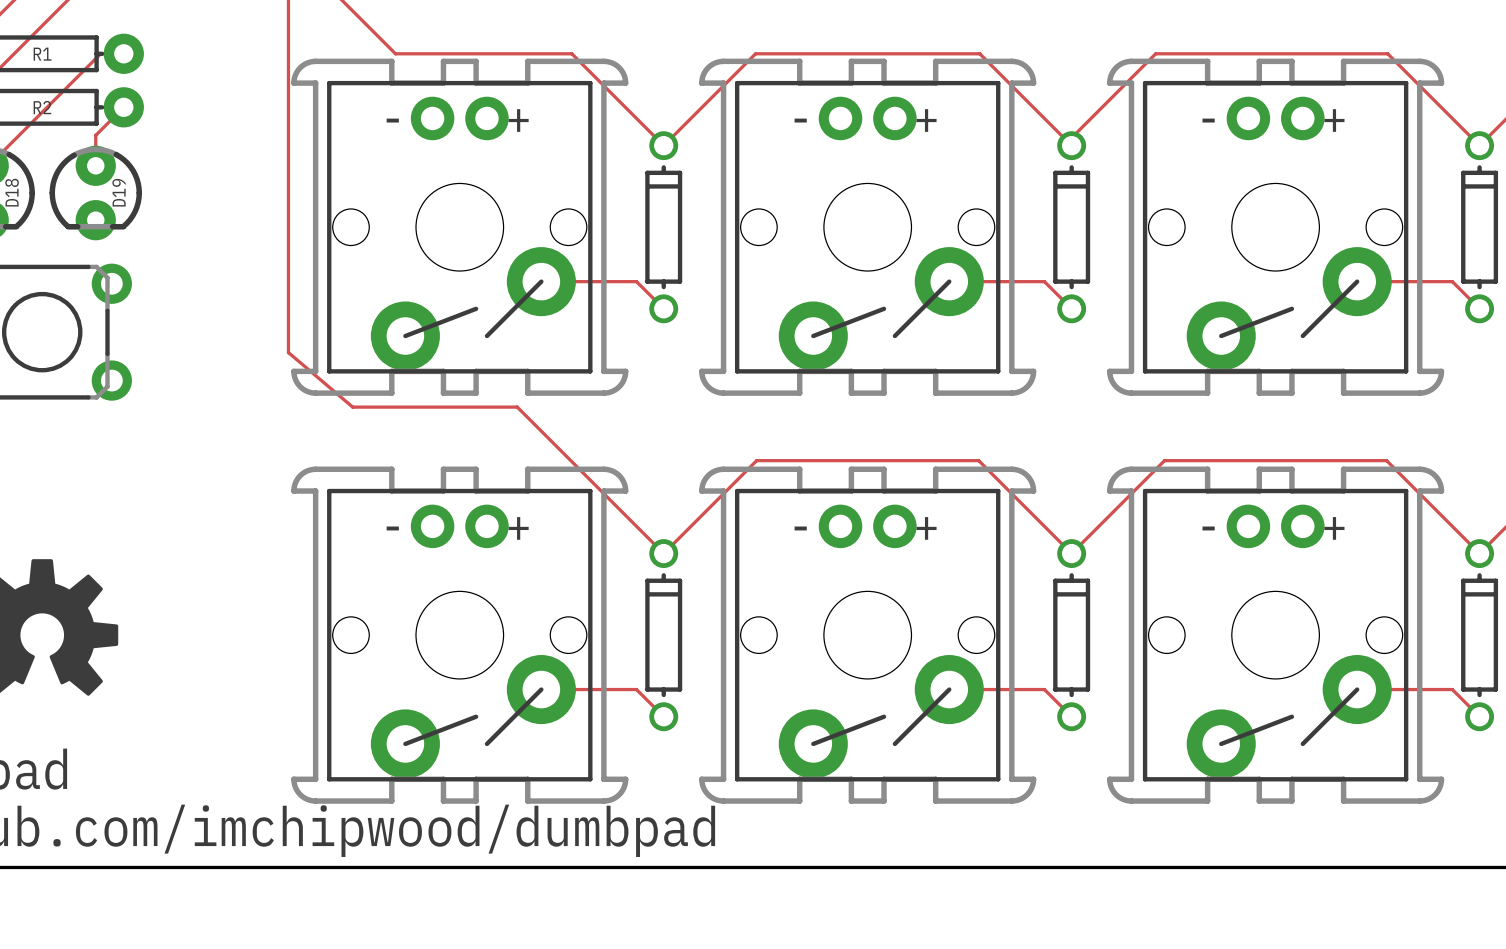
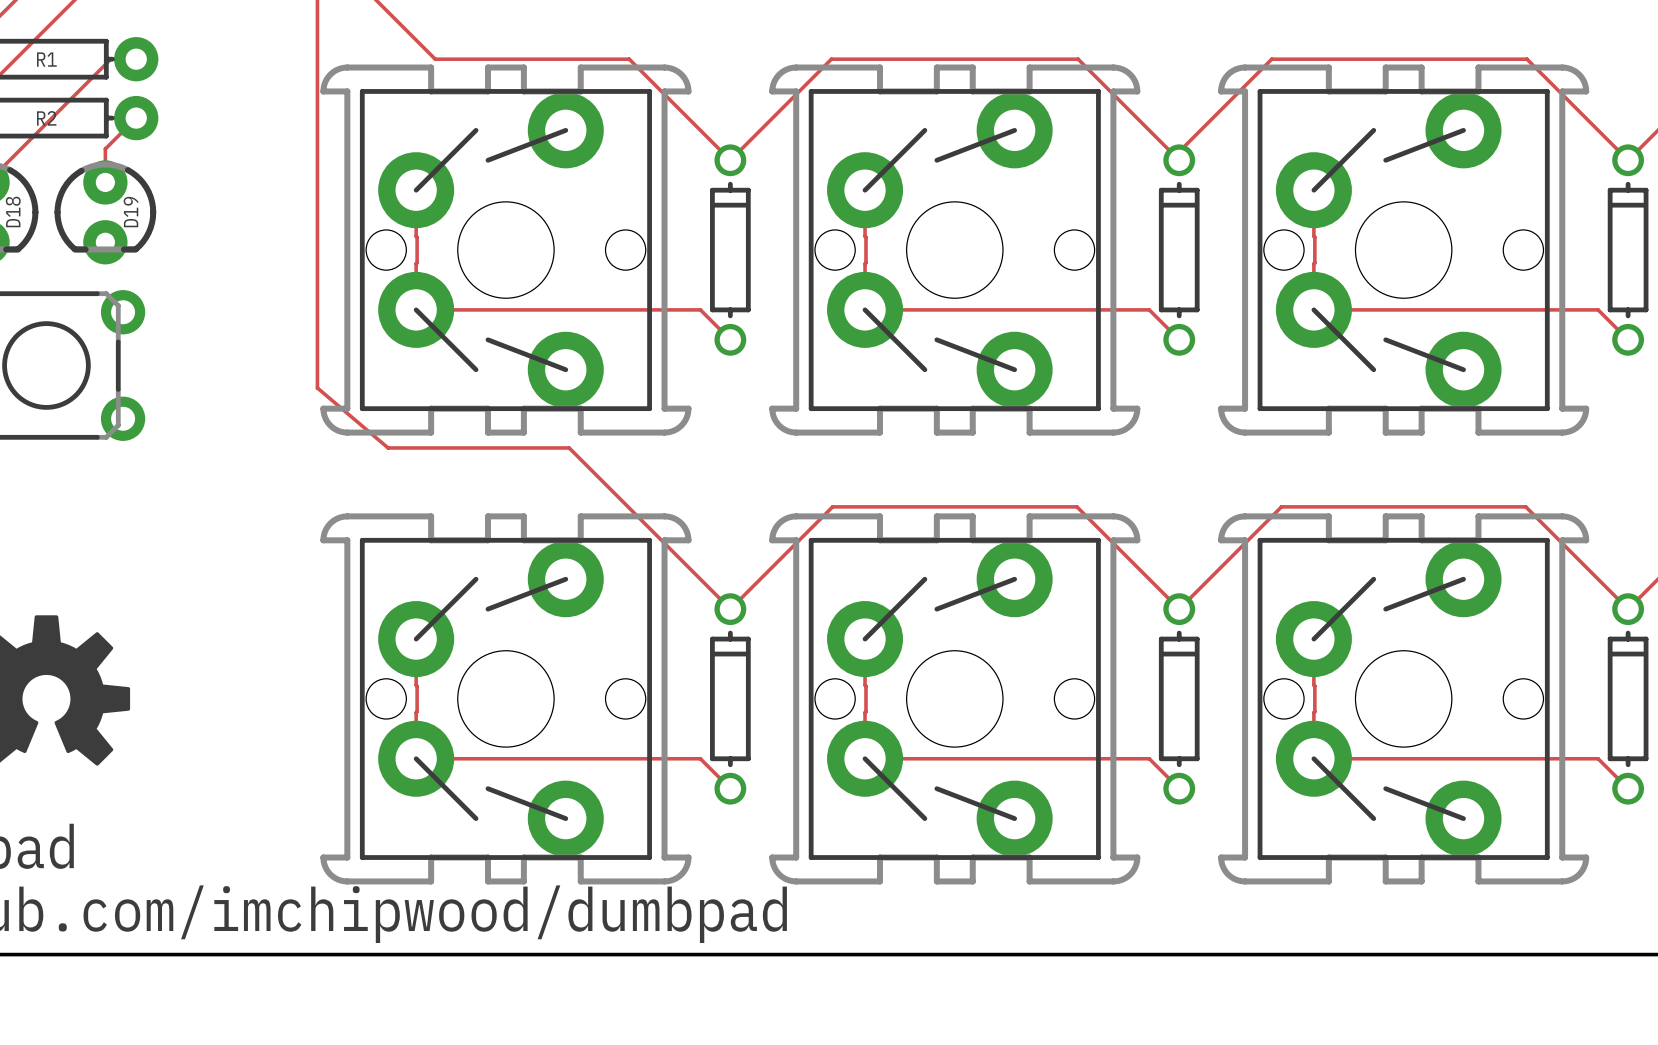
part footprint: [291, 58, 629, 396] -> [320, 64, 692, 436]
part footprint: [699, 58, 1037, 396] -> [769, 64, 1141, 436]
part footprint: [1107, 58, 1445, 396] -> [1218, 64, 1590, 436]
track: none -> (416, 190) (416, 309) (595, 309)
track: none -> (865, 190) (865, 309) (1044, 309)
track: none -> (1313, 190) (1313, 309) (1493, 309)
part footprint: [291, 466, 629, 804] -> [320, 513, 692, 885]
part footprint: [699, 466, 1037, 804] -> [769, 513, 1141, 885]
part footprint: [1107, 466, 1445, 804] -> [1218, 513, 1590, 885]
track: none -> (416, 639) (416, 758) (595, 758)
track: none -> (865, 639) (865, 758) (1044, 758)
track: none -> (1313, 639) (1313, 758) (1493, 758)

